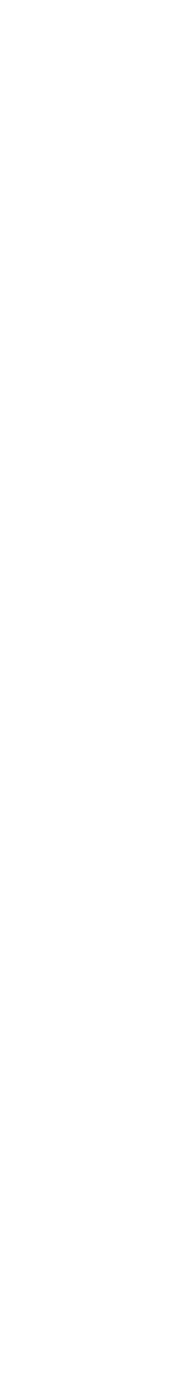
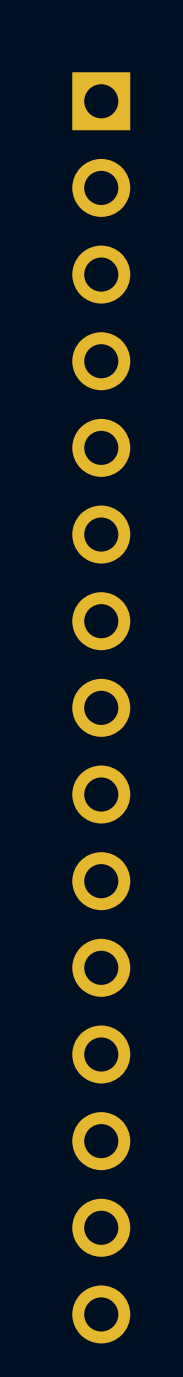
part: none -> (101, 707)

